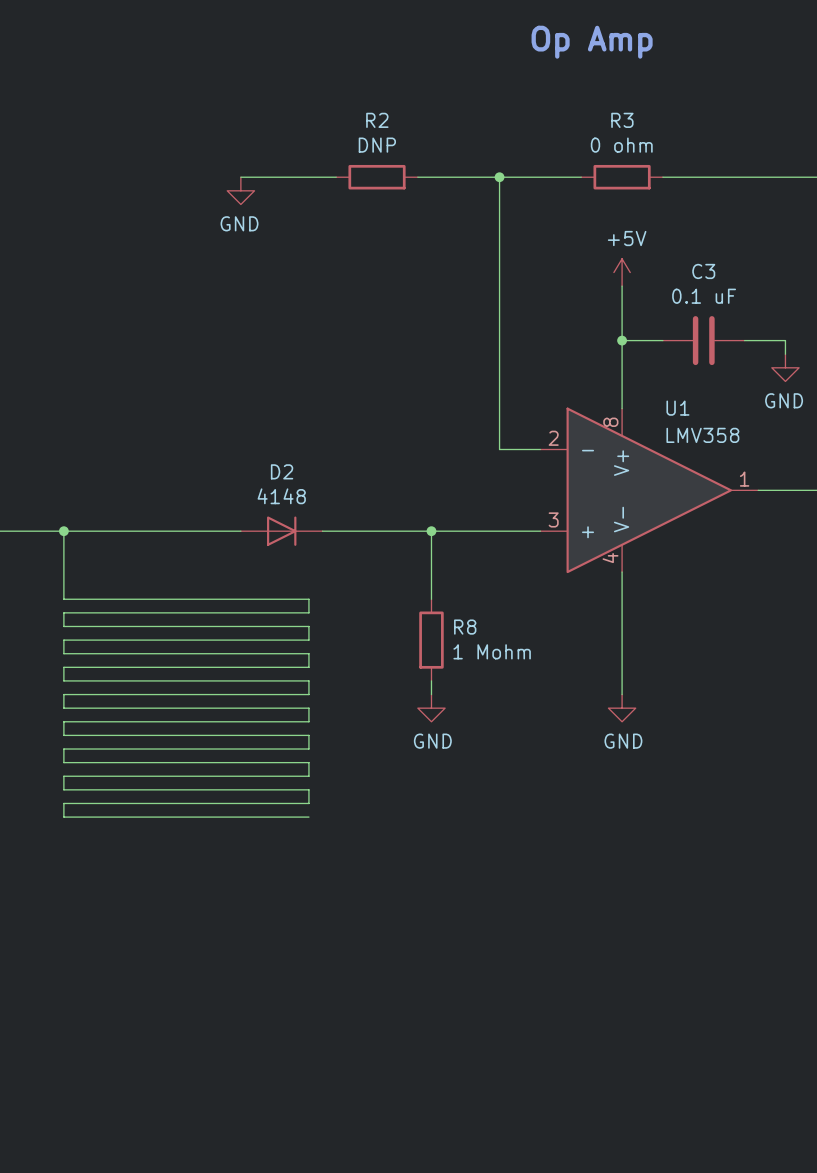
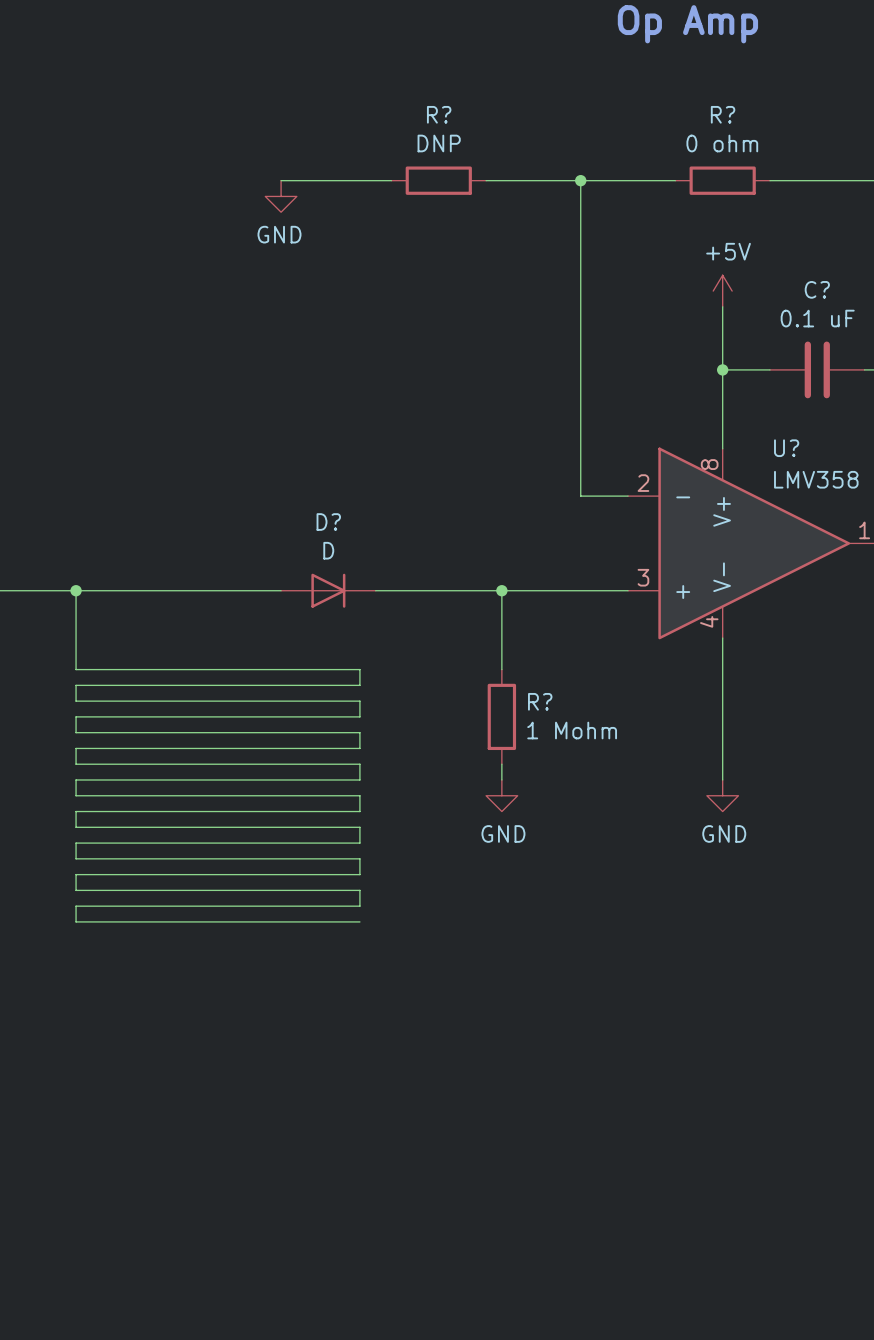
R2 name: R2 (377, 120) -> R? (439, 114)
R3 name: R3 (622, 120) -> R? (723, 114)
C3 name: C3 (703, 271) -> C? (817, 289)
U1 name: U1 (677, 408) -> U? (786, 448)
D2 name: D2 (282, 471) -> D? (328, 522)
D2 value: 4148 (281, 496) -> D (328, 550)
R8 name: R8 (465, 627) -> R? (540, 701)

